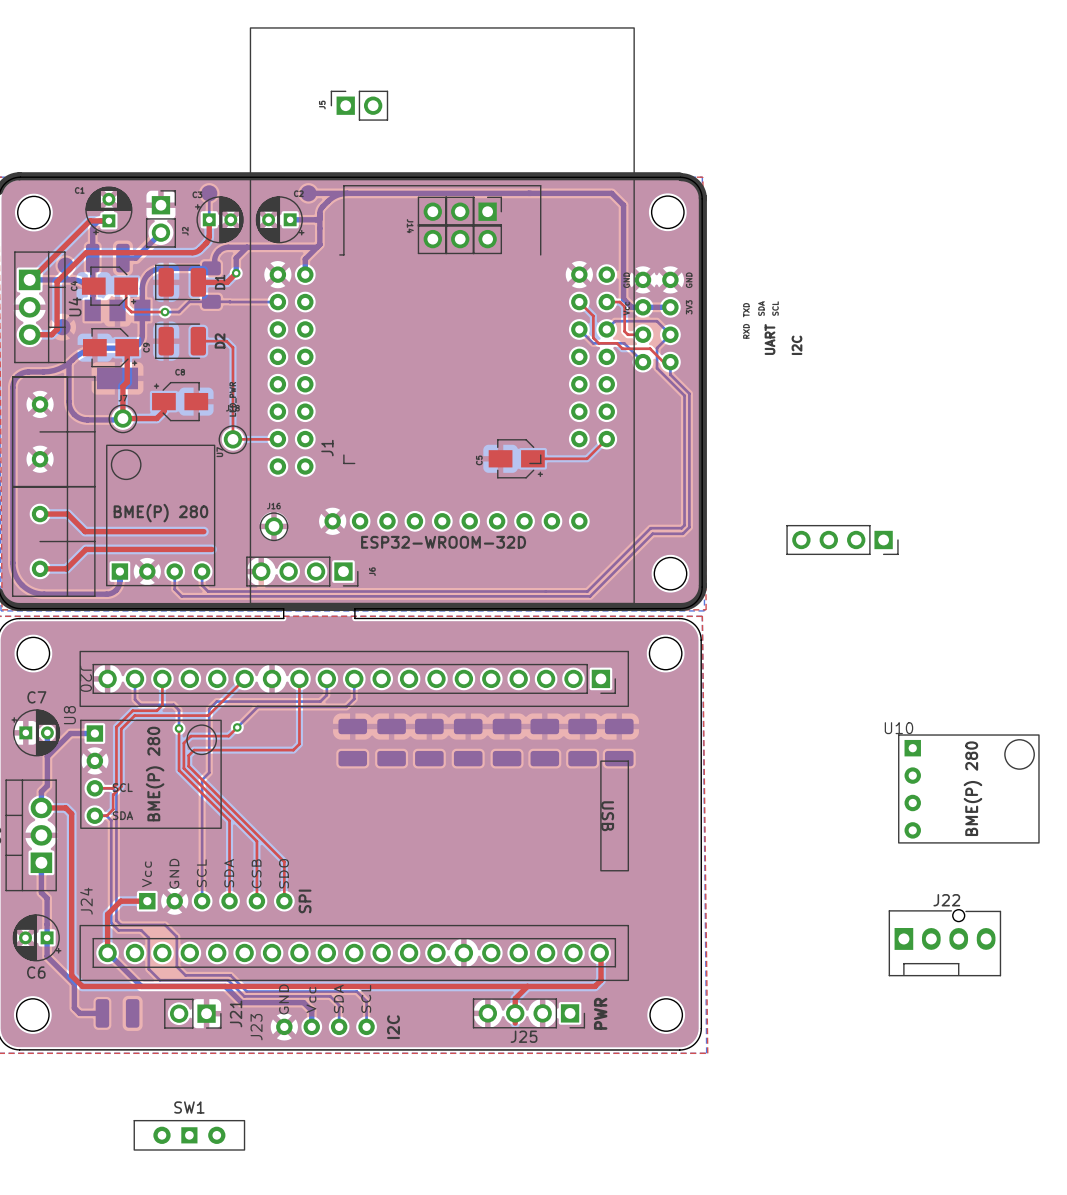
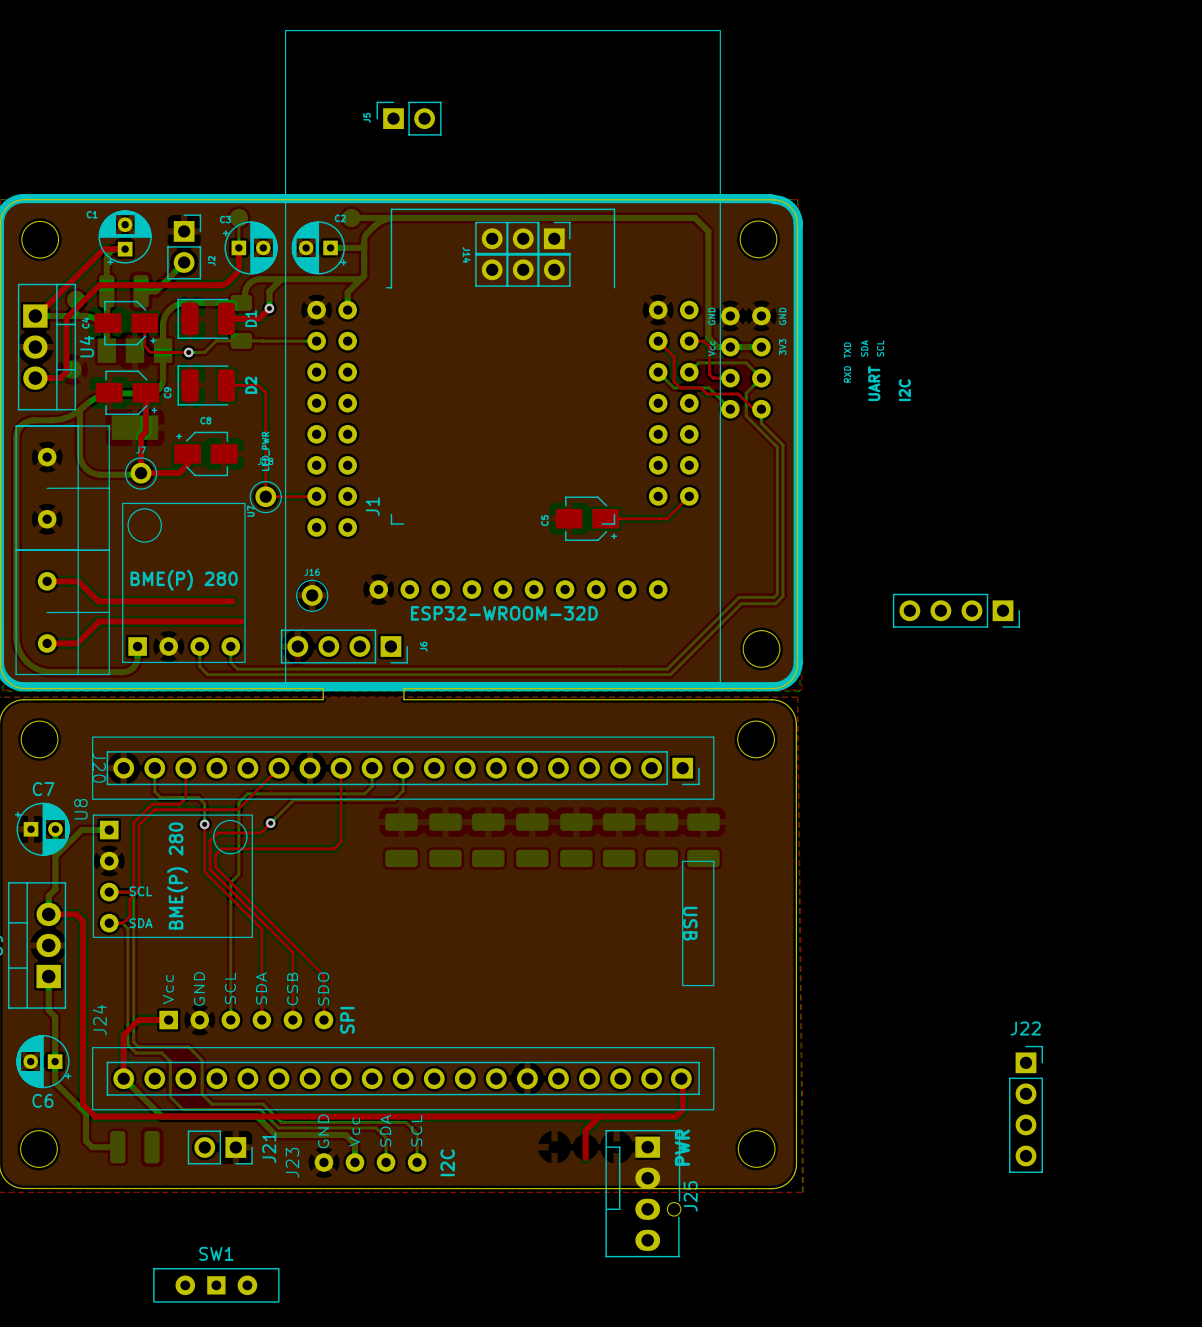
U10: (968, 788) -> none
J22 name position: J22 (946, 900) -> J22 (1025, 1028)
J22 footprint: [888, 909, 1002, 977] -> [1009, 1045, 1044, 1173]
J25 footprint: [472, 998, 586, 1029] -> [605, 1129, 681, 1258]
J25 name position: J25 (524, 1036) -> J25 (690, 1196)

